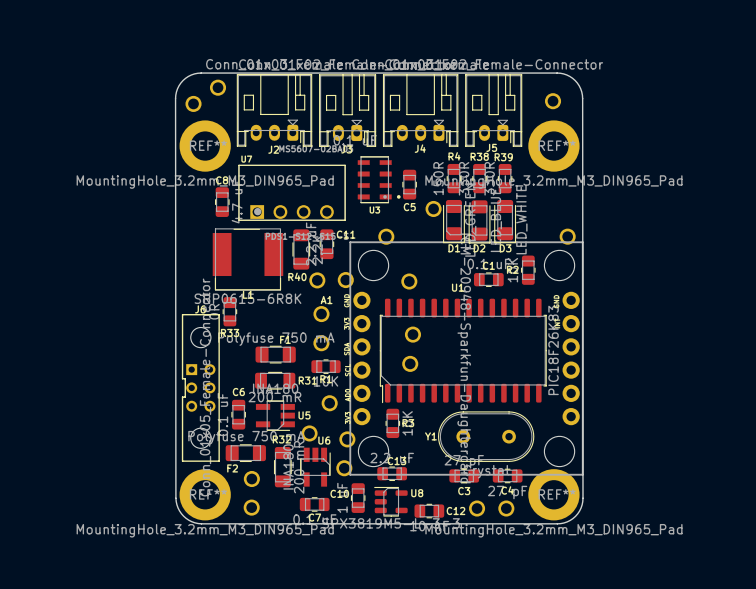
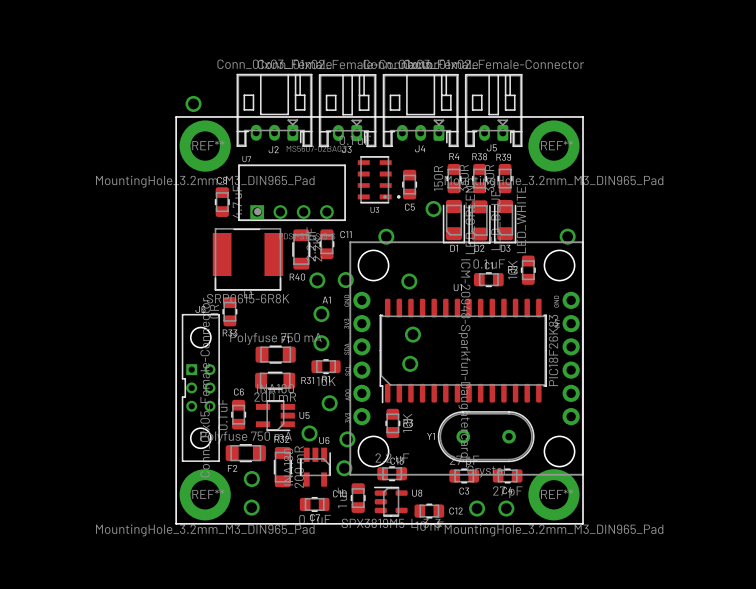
board edge: (201, 73) (557, 73) (566, 74) (577, 83) (582, 98) (583, 498) (579, 511) (572, 518) (557, 523) (201, 523) (191, 521) (181, 513) (175, 498) (175, 98) (177, 88) (183, 80) (191, 74) (201, 73) -> (176, 116) (176, 523) (583, 523) (583, 116) (176, 116)
part: (218, 87) -> none
part: (553, 101) -> none

